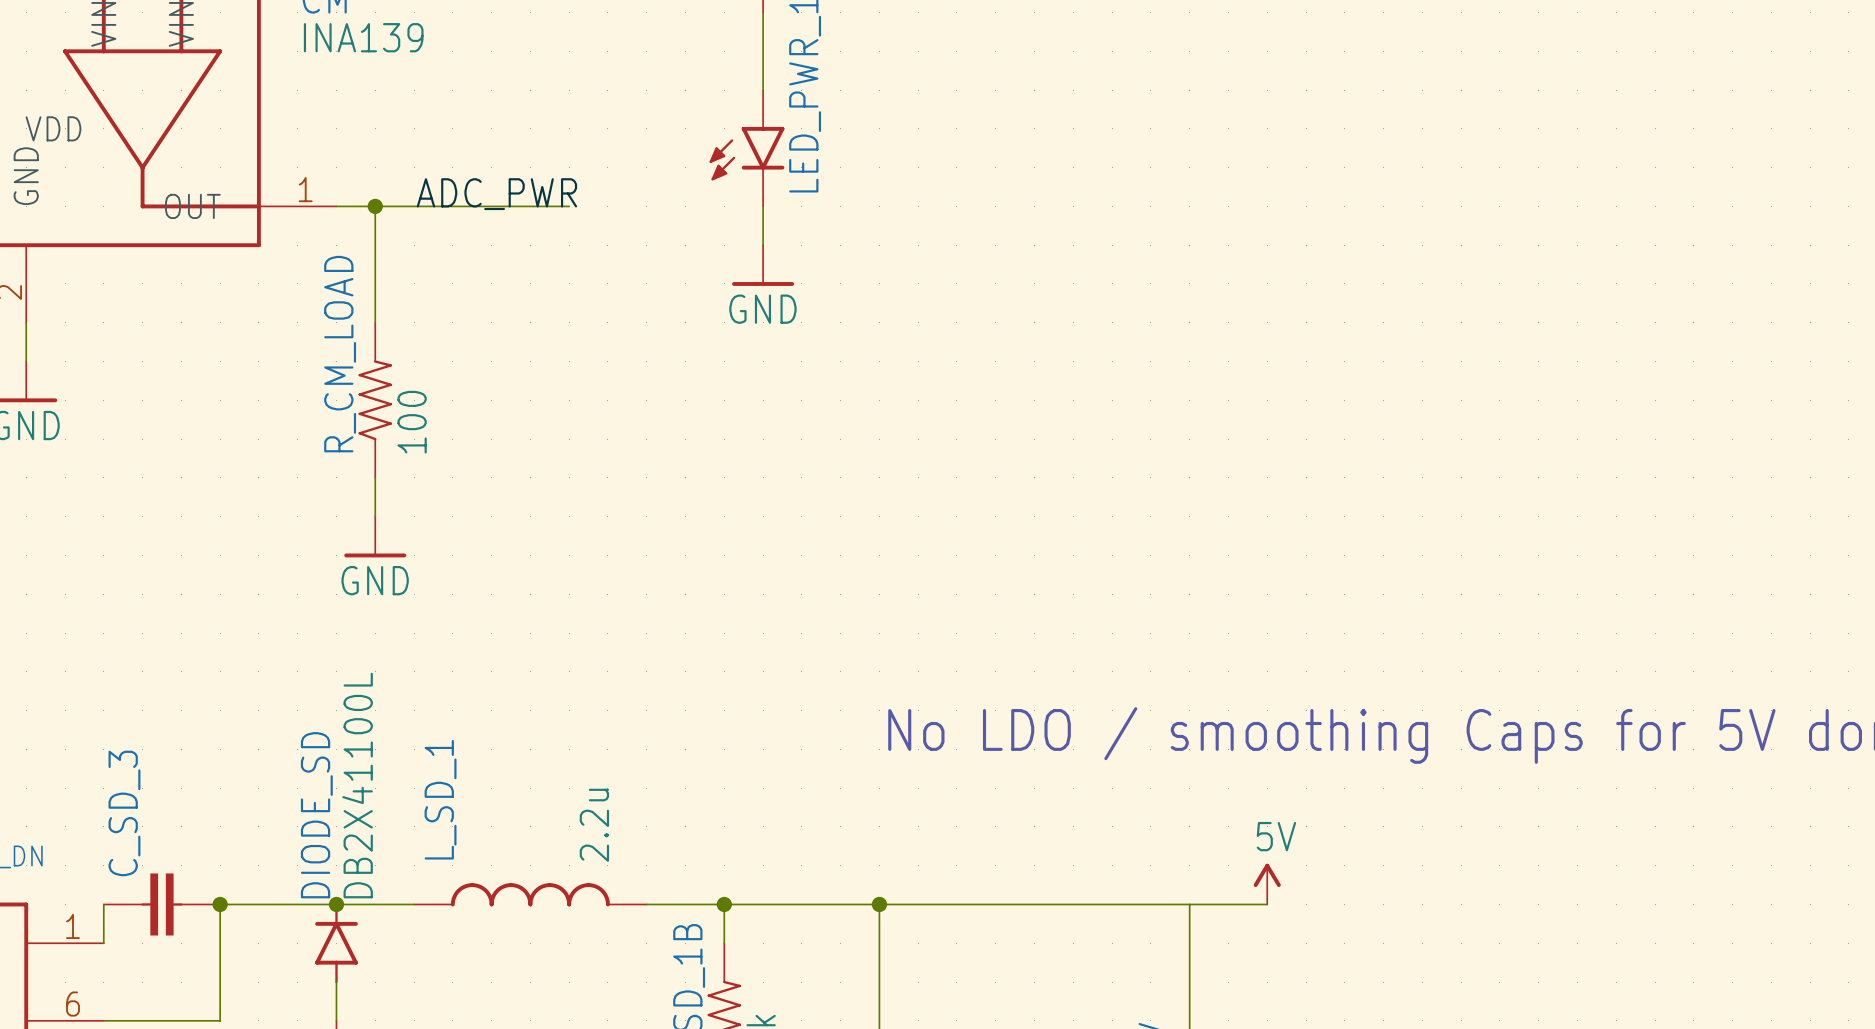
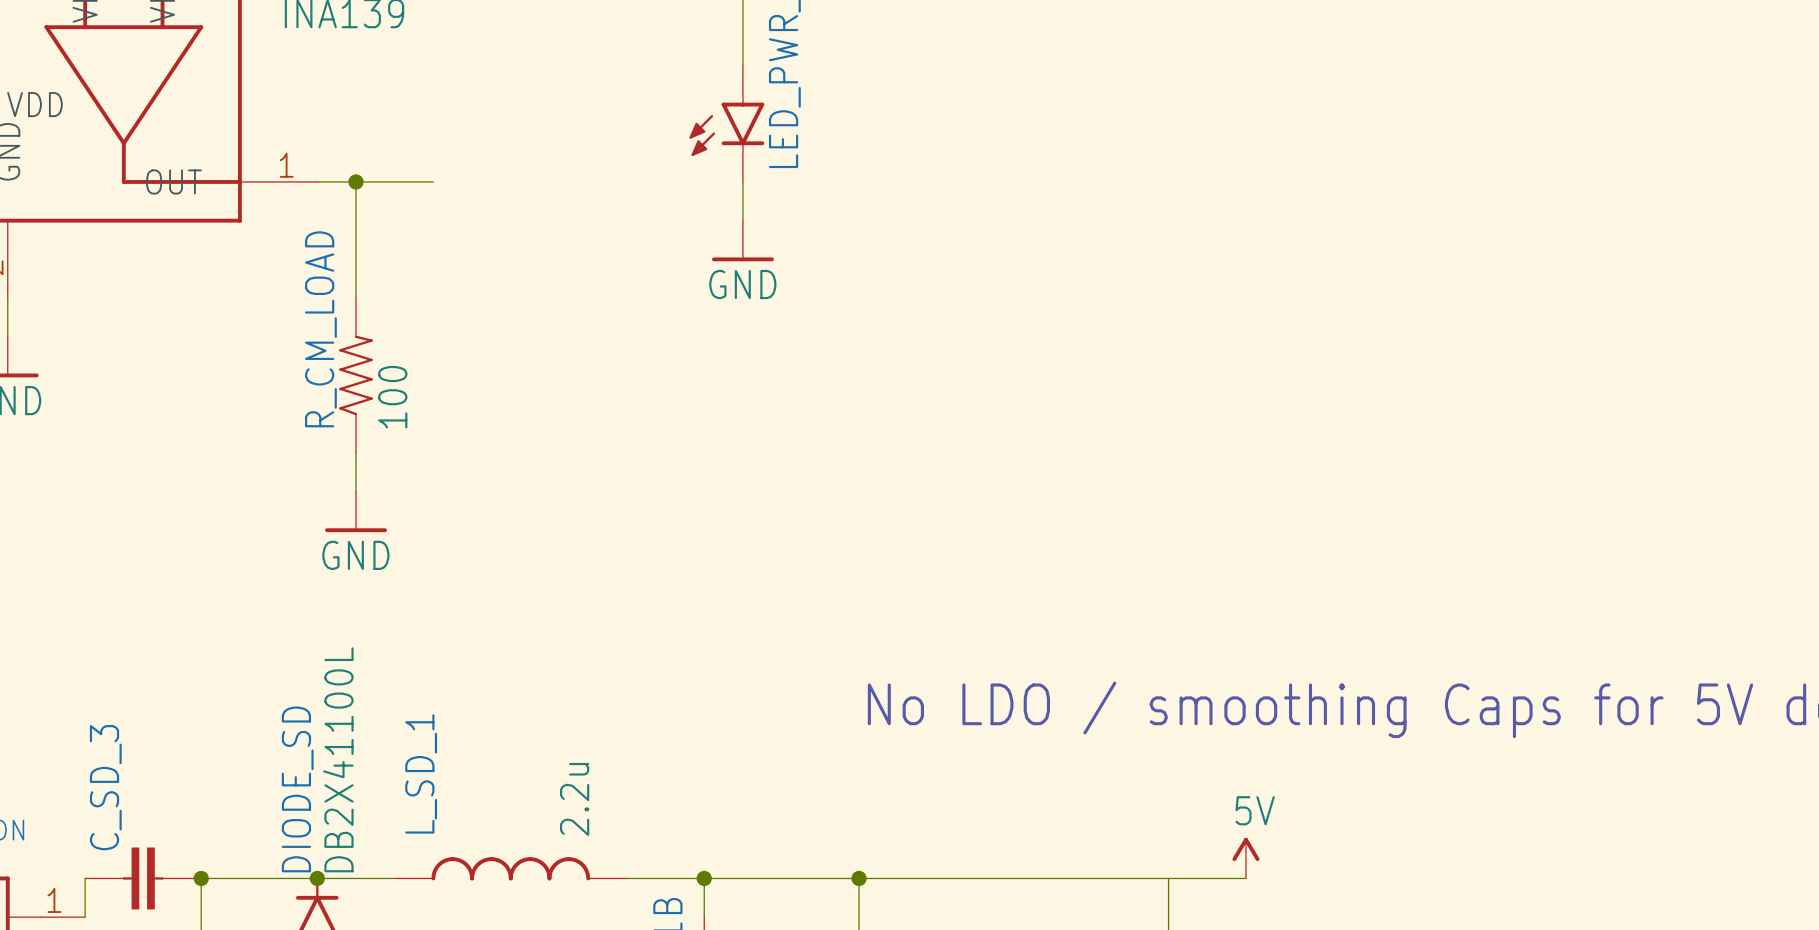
label: ADC_PWR (496, 194) -> none
wire: (452, 206) (569, 206) -> none

